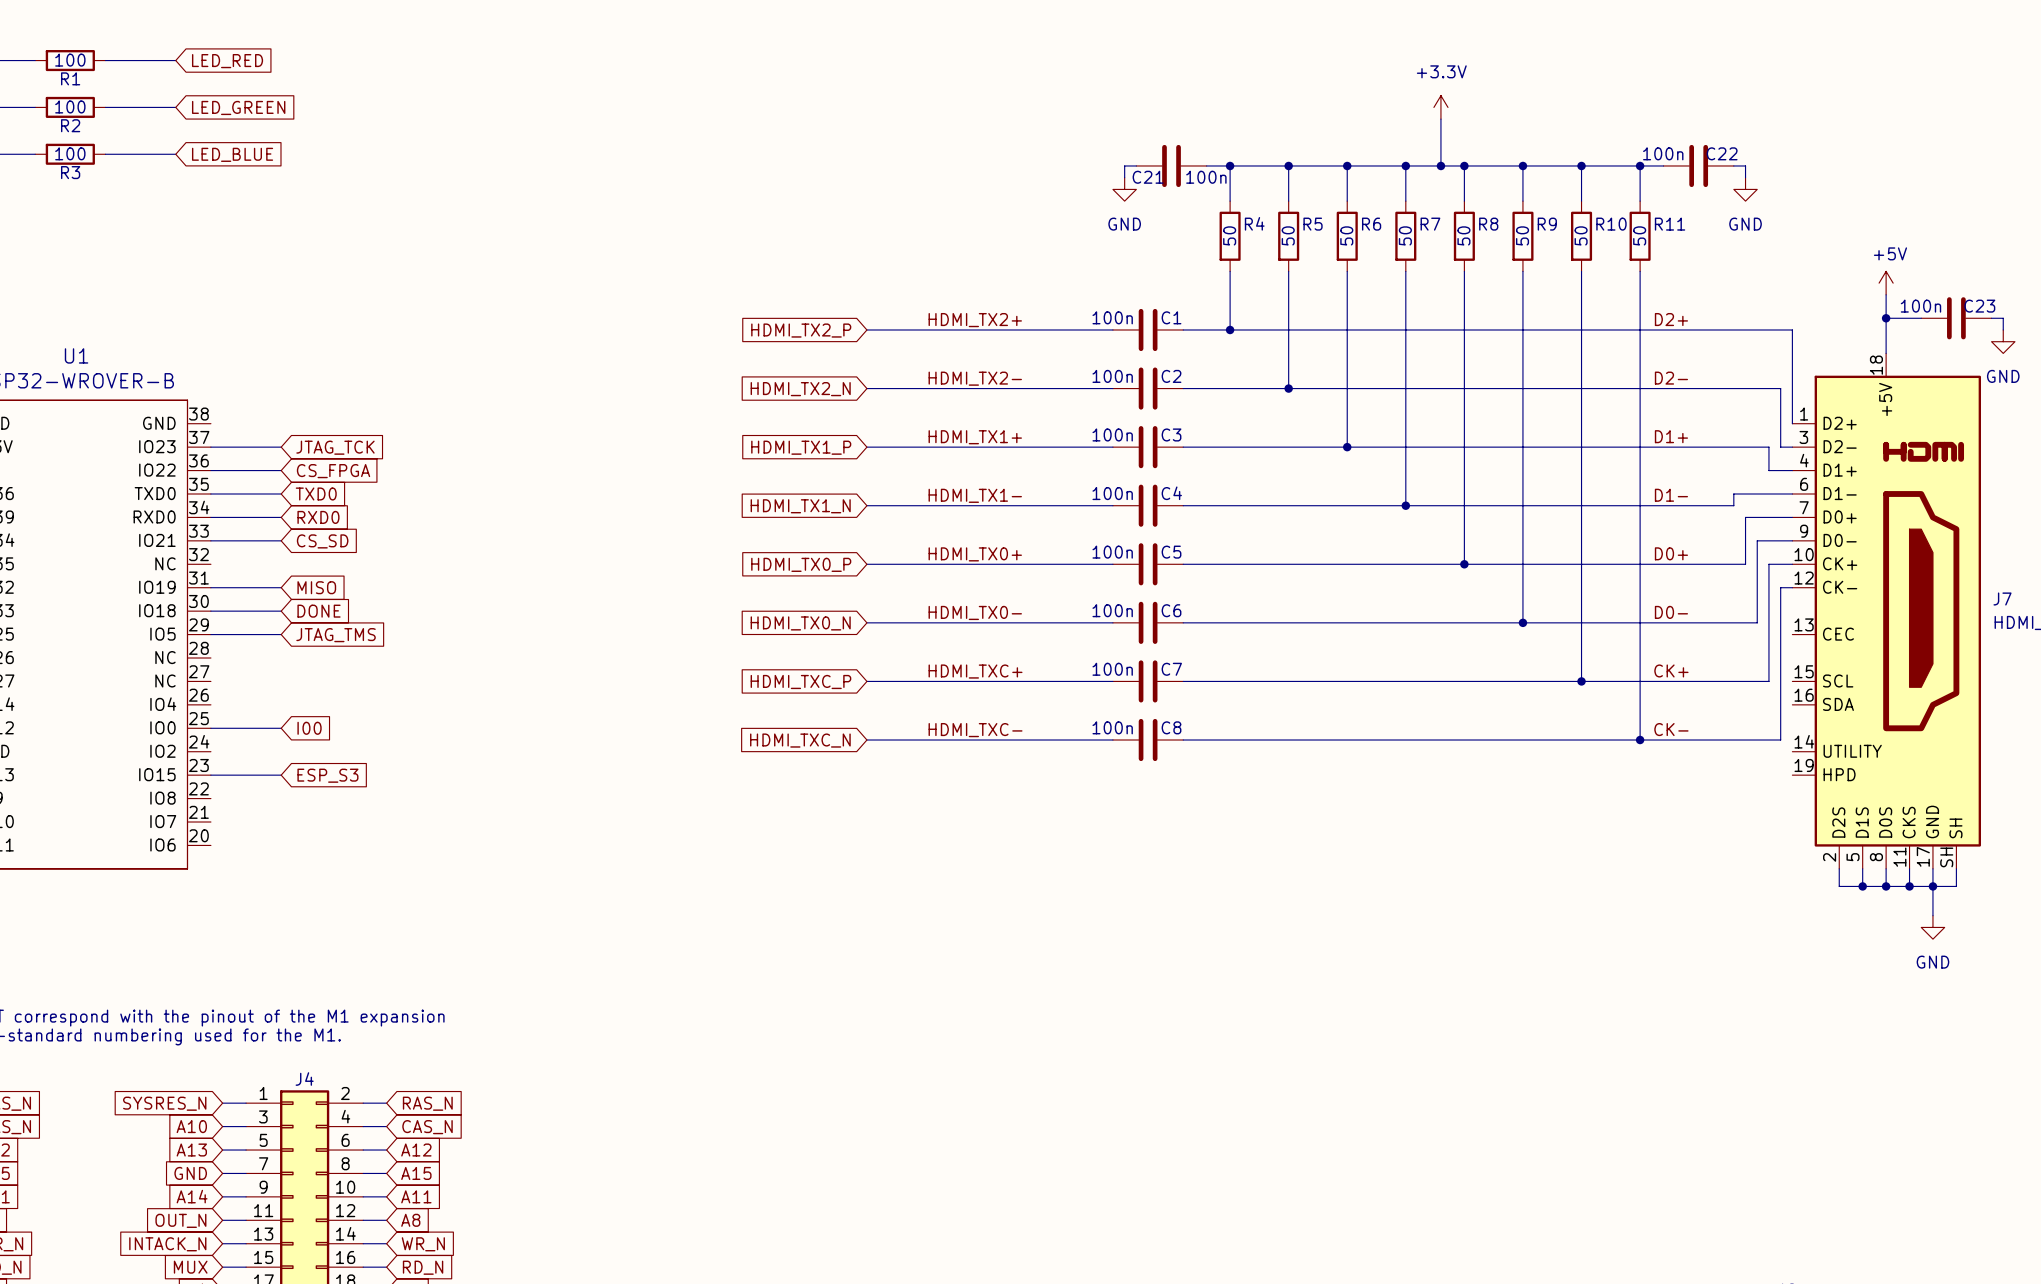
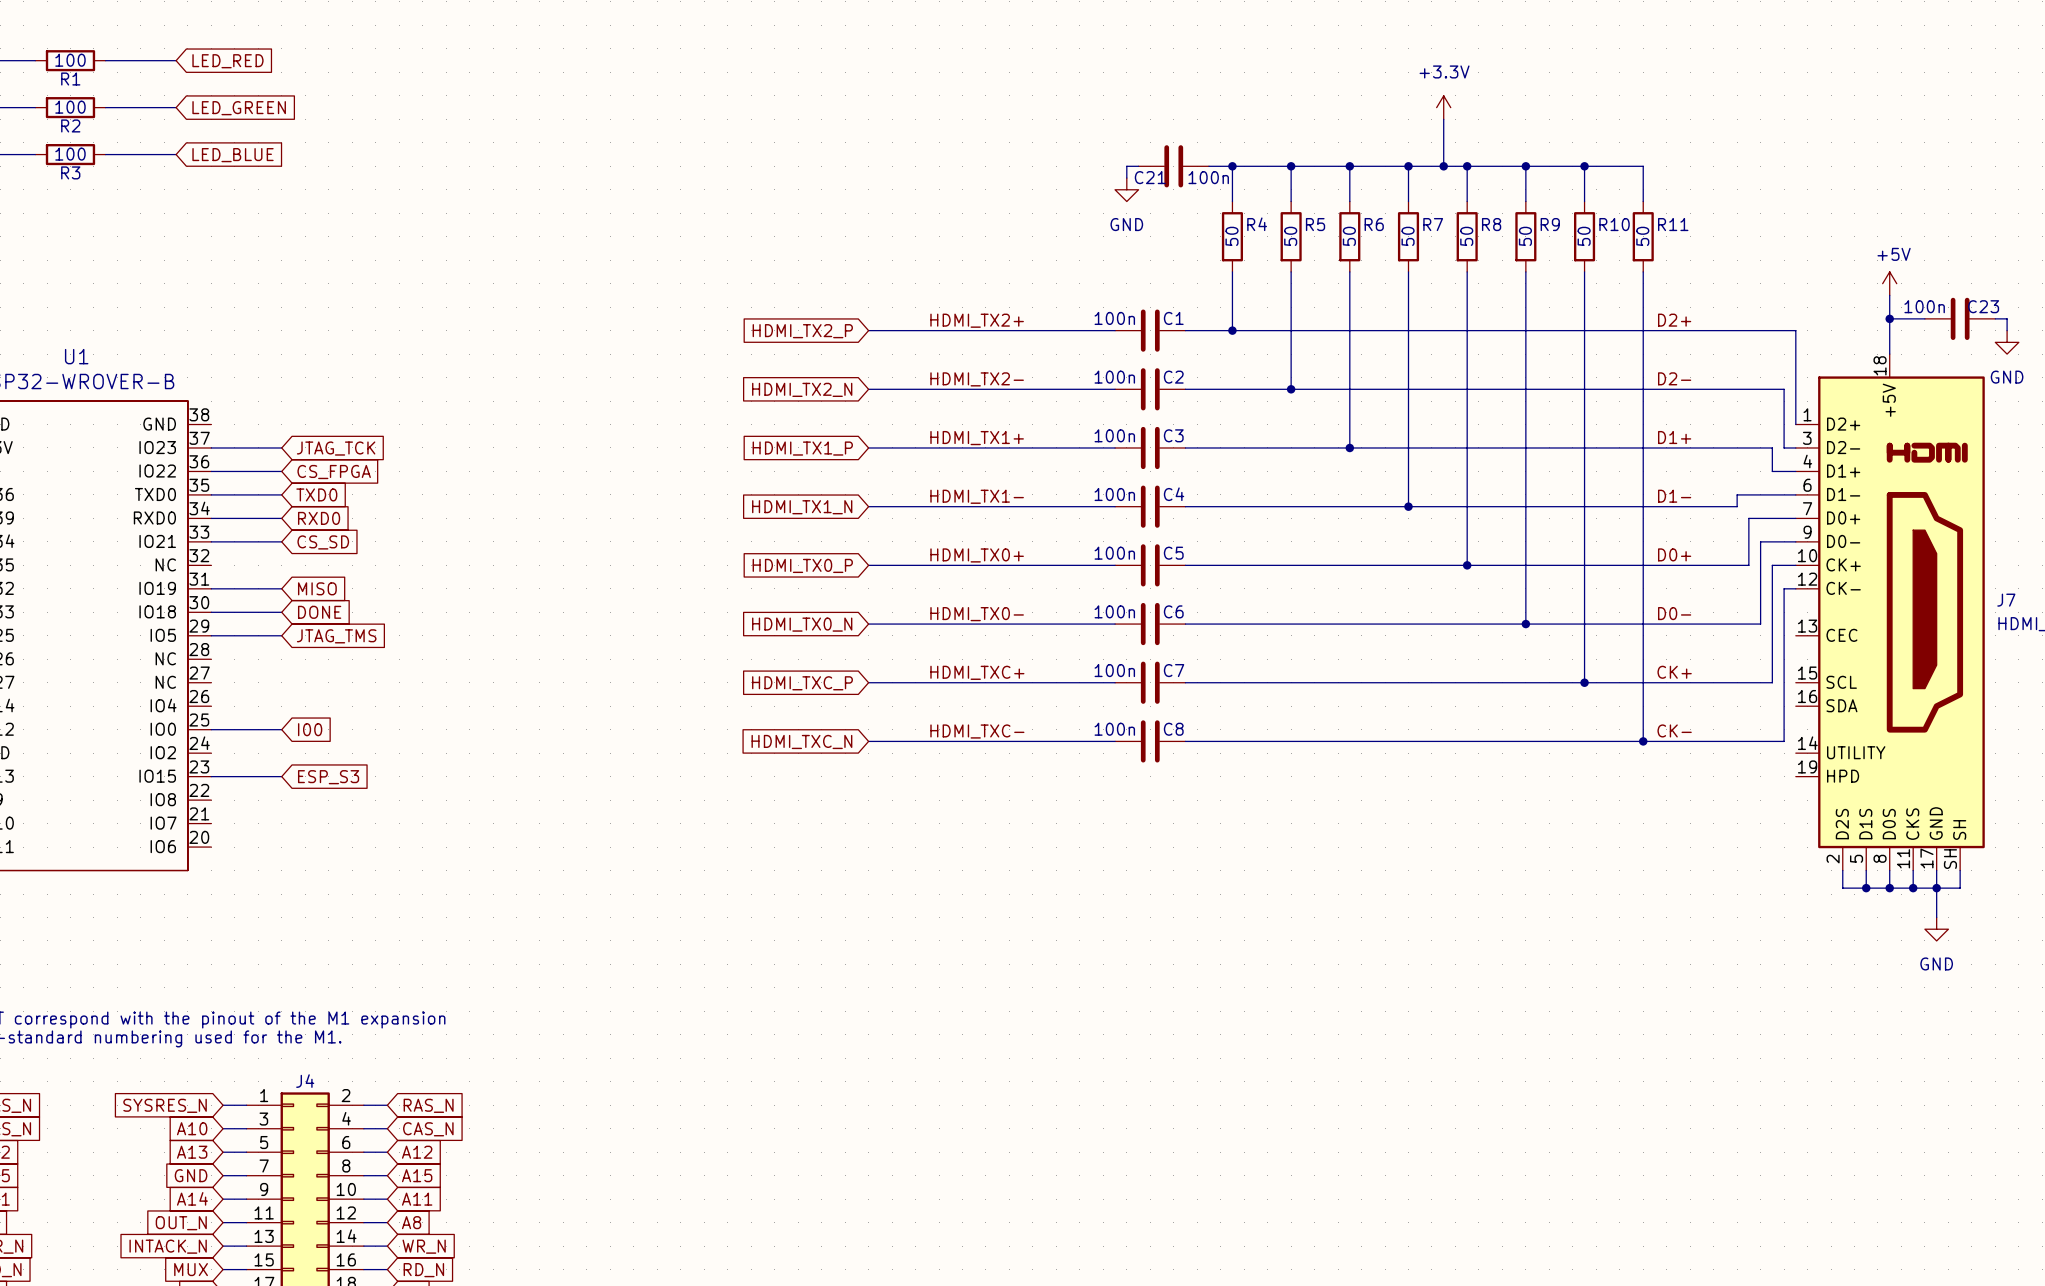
wire: (1640, 165) (1663, 165) -> none
junction: (1640, 165) -> none
C22: 100n (1698, 165) -> none
wire: (1733, 165) (1745, 165) (1745, 177) -> none
power symbol: GND (1745, 189) -> none

